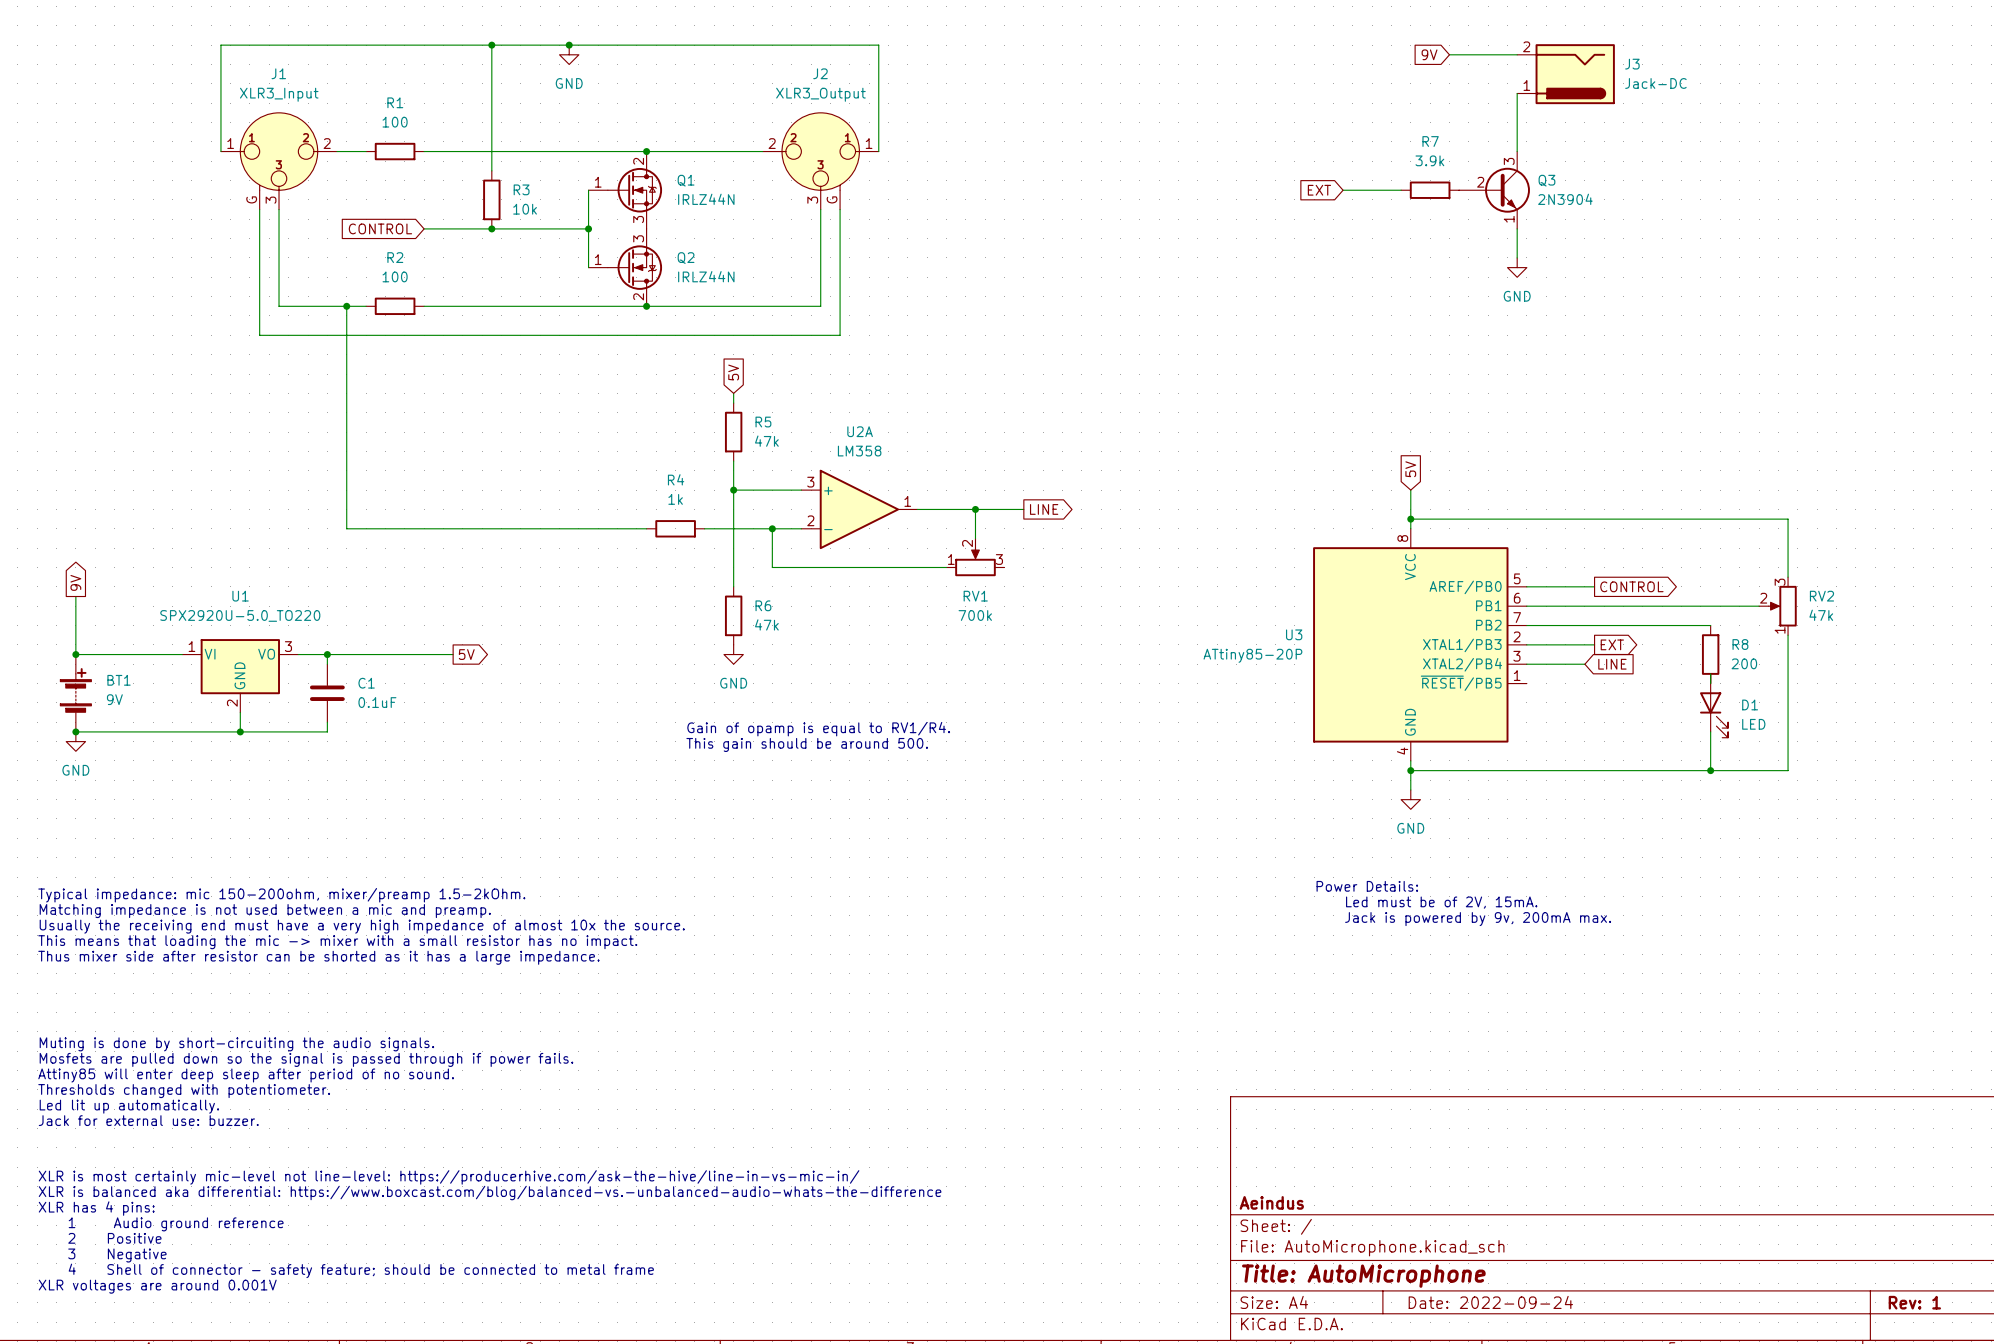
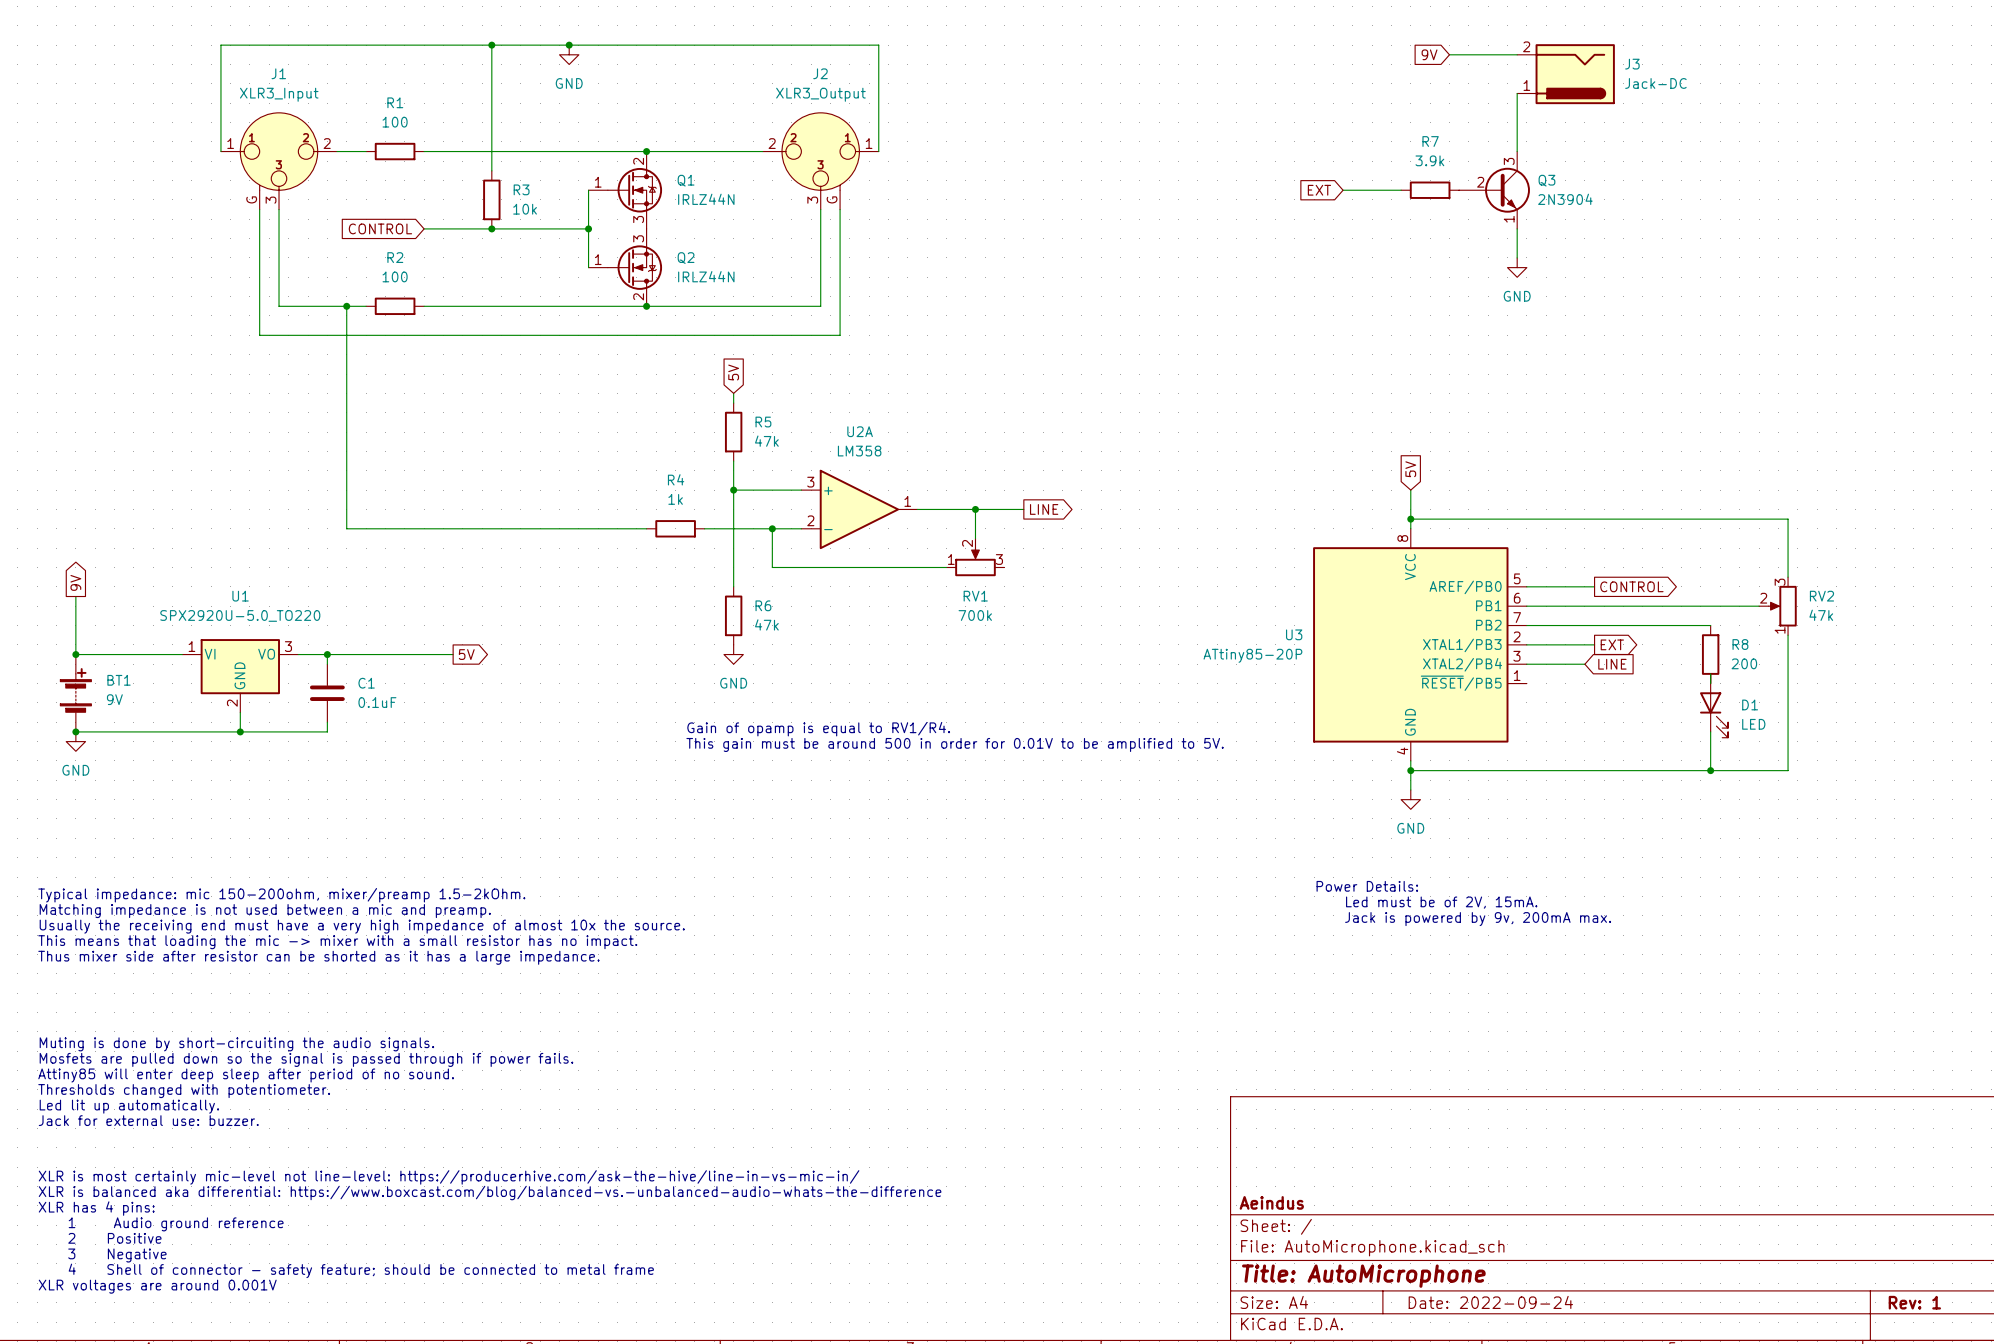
text: This gain should be around 500. (807, 744) -> This gain must be around 500 in order for 0.01V to be amplified to 5V. (955, 744)

